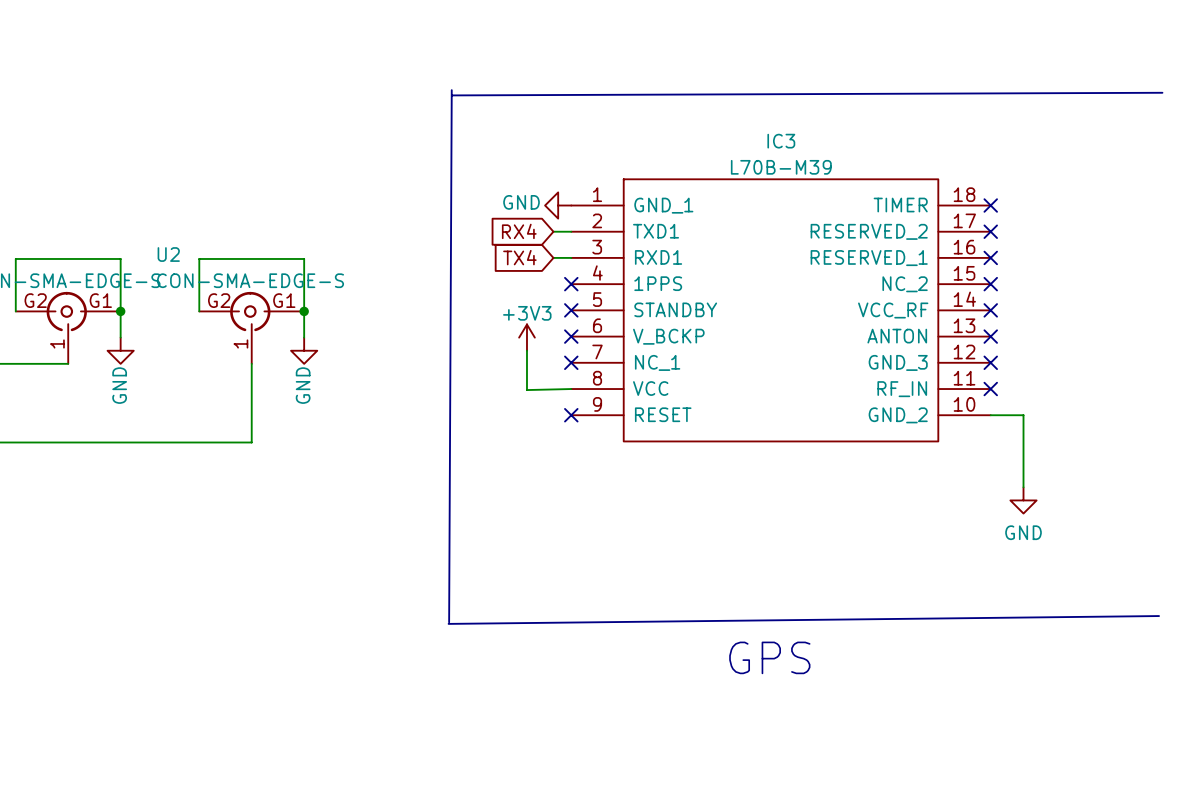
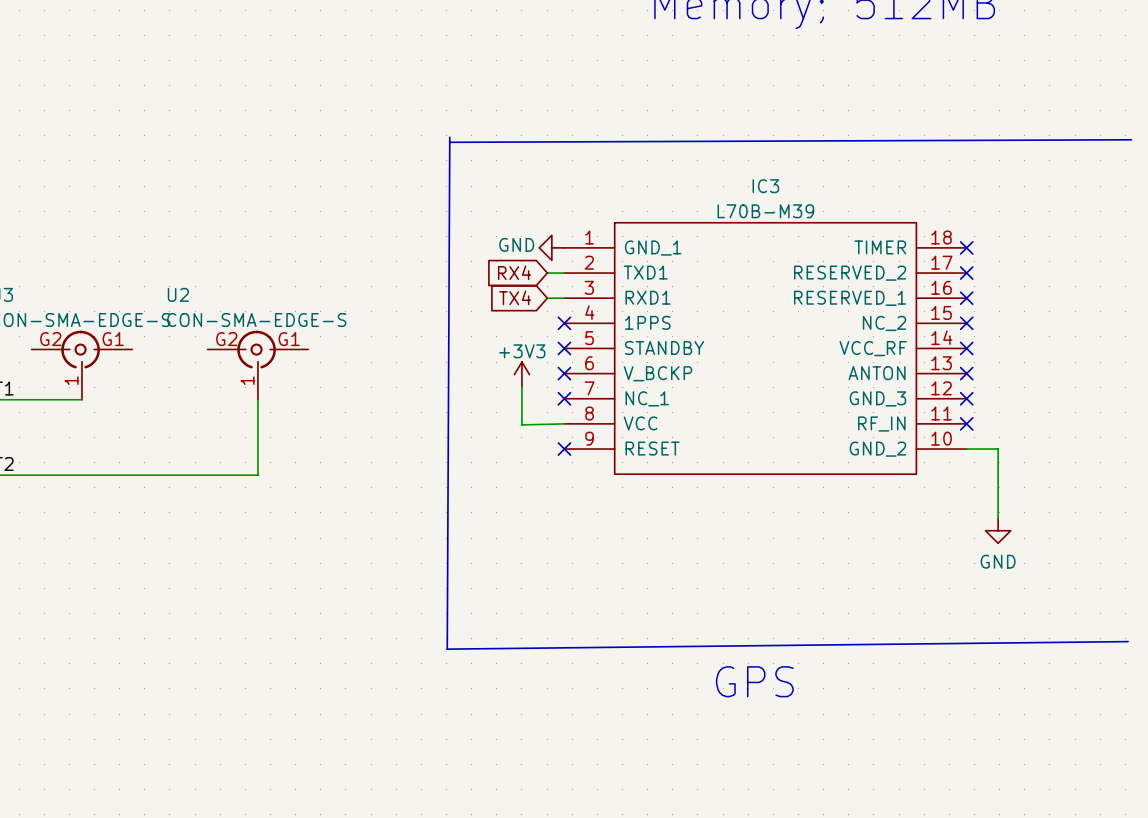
wire: (15, 311) (15, 258) (120, 258) (120, 337) -> none
junction: (120, 311) -> none
wire: (199, 311) (199, 258) (304, 258) (304, 337) -> none
junction: (304, 311) -> none
power symbol: GND (120, 350) -> none
power symbol: GND (304, 350) -> none

